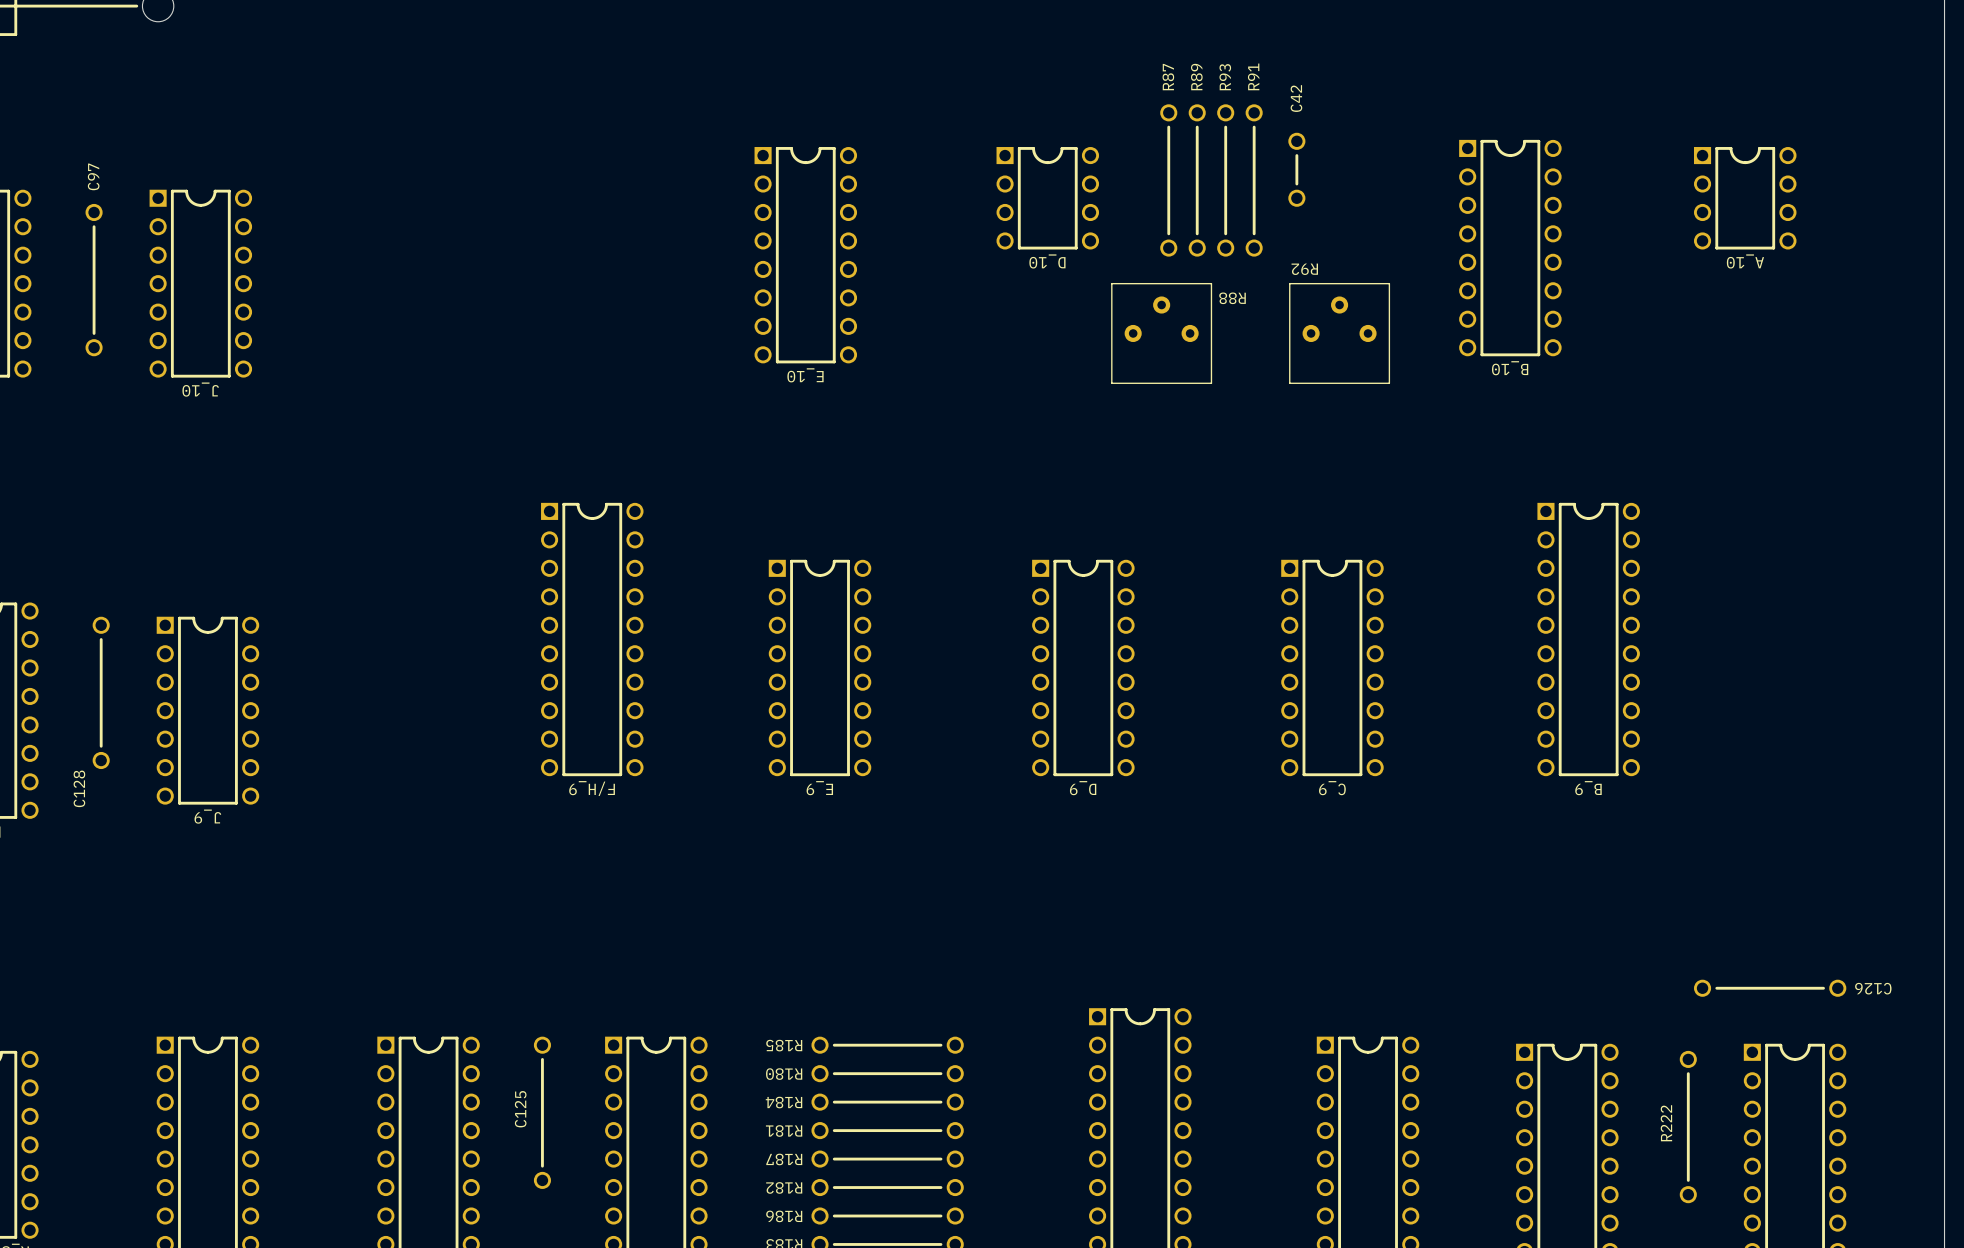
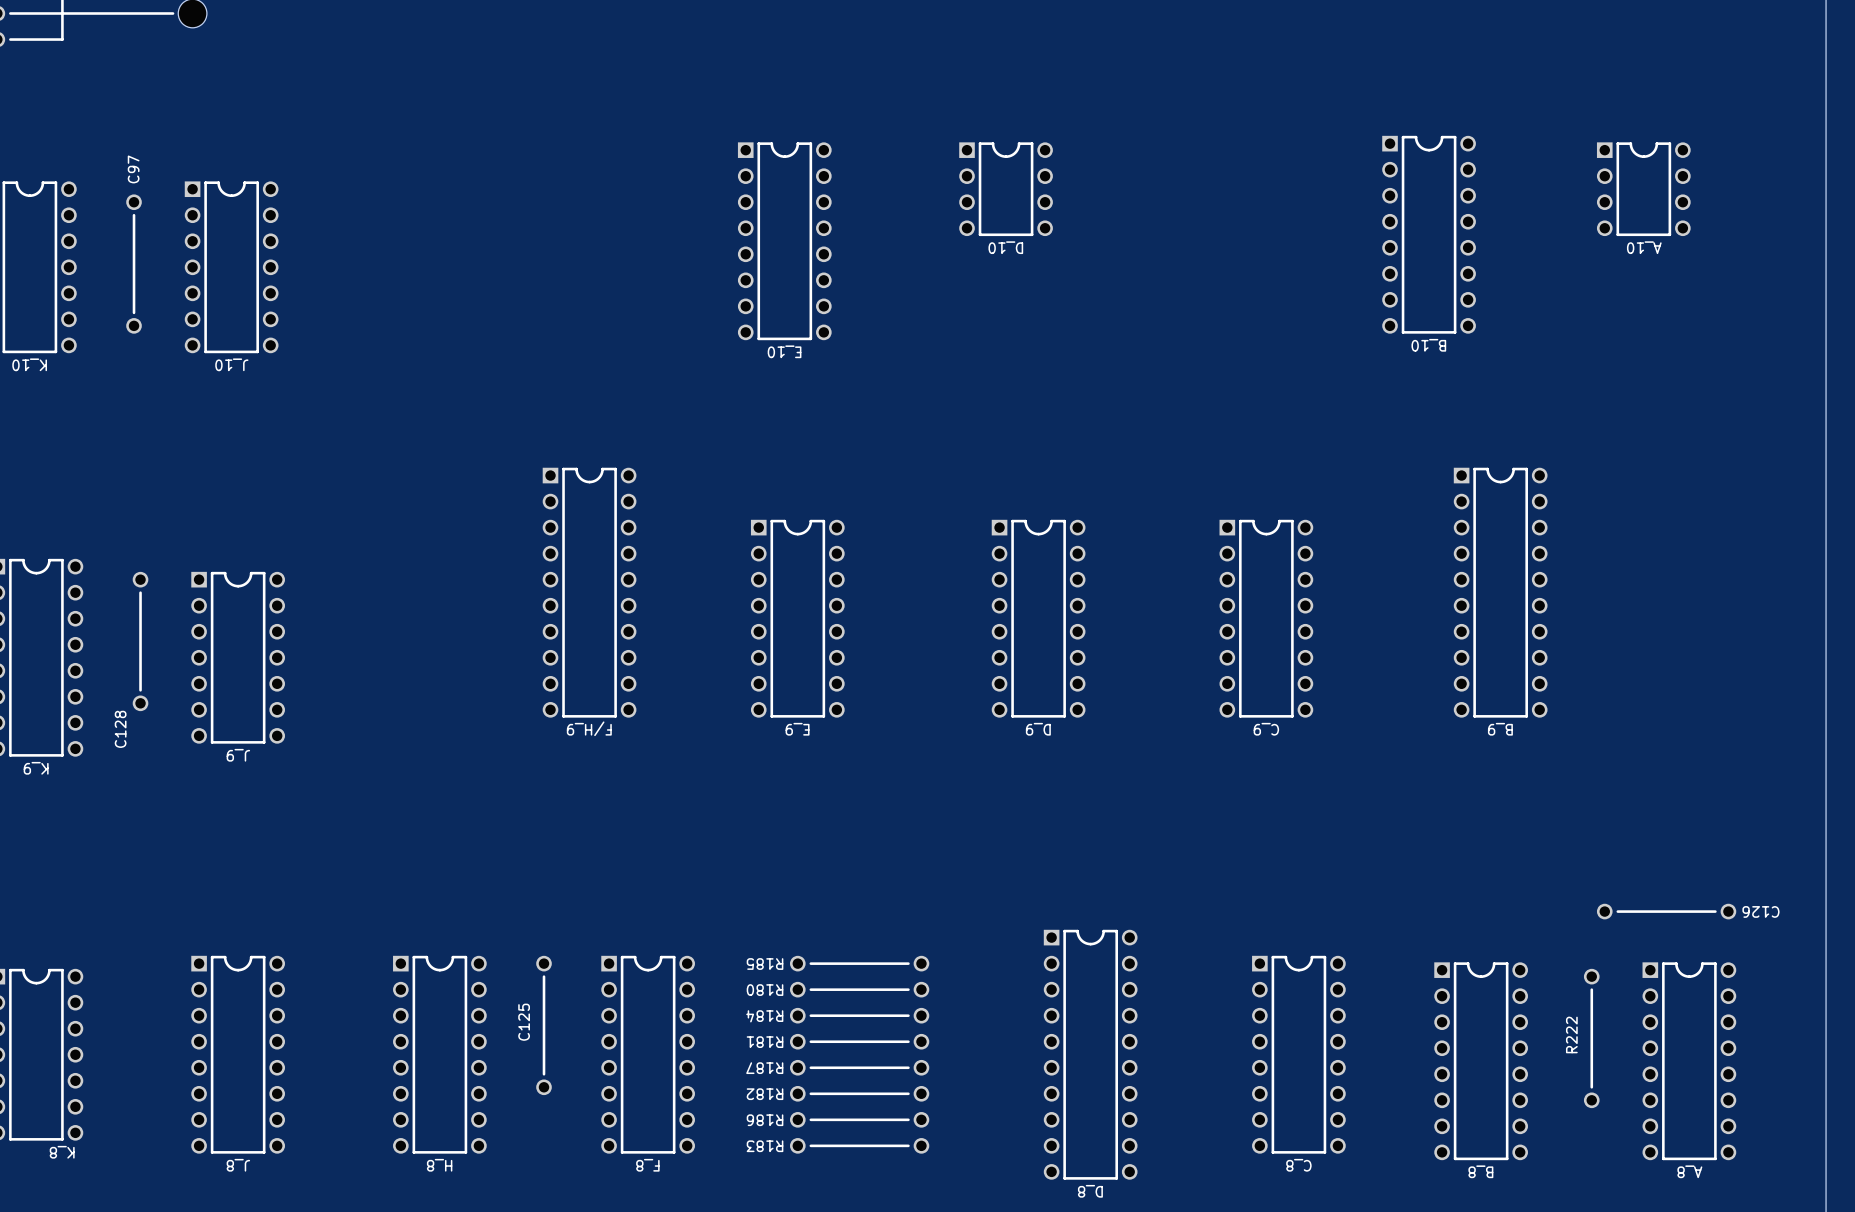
C42: (1296, 169) -> none
R87: (1168, 180) -> none
R89: (1197, 180) -> none
R93: (1225, 180) -> none
R91: (1254, 180) -> none
R88: (1161, 333) -> none
R92: (1339, 333) -> none

